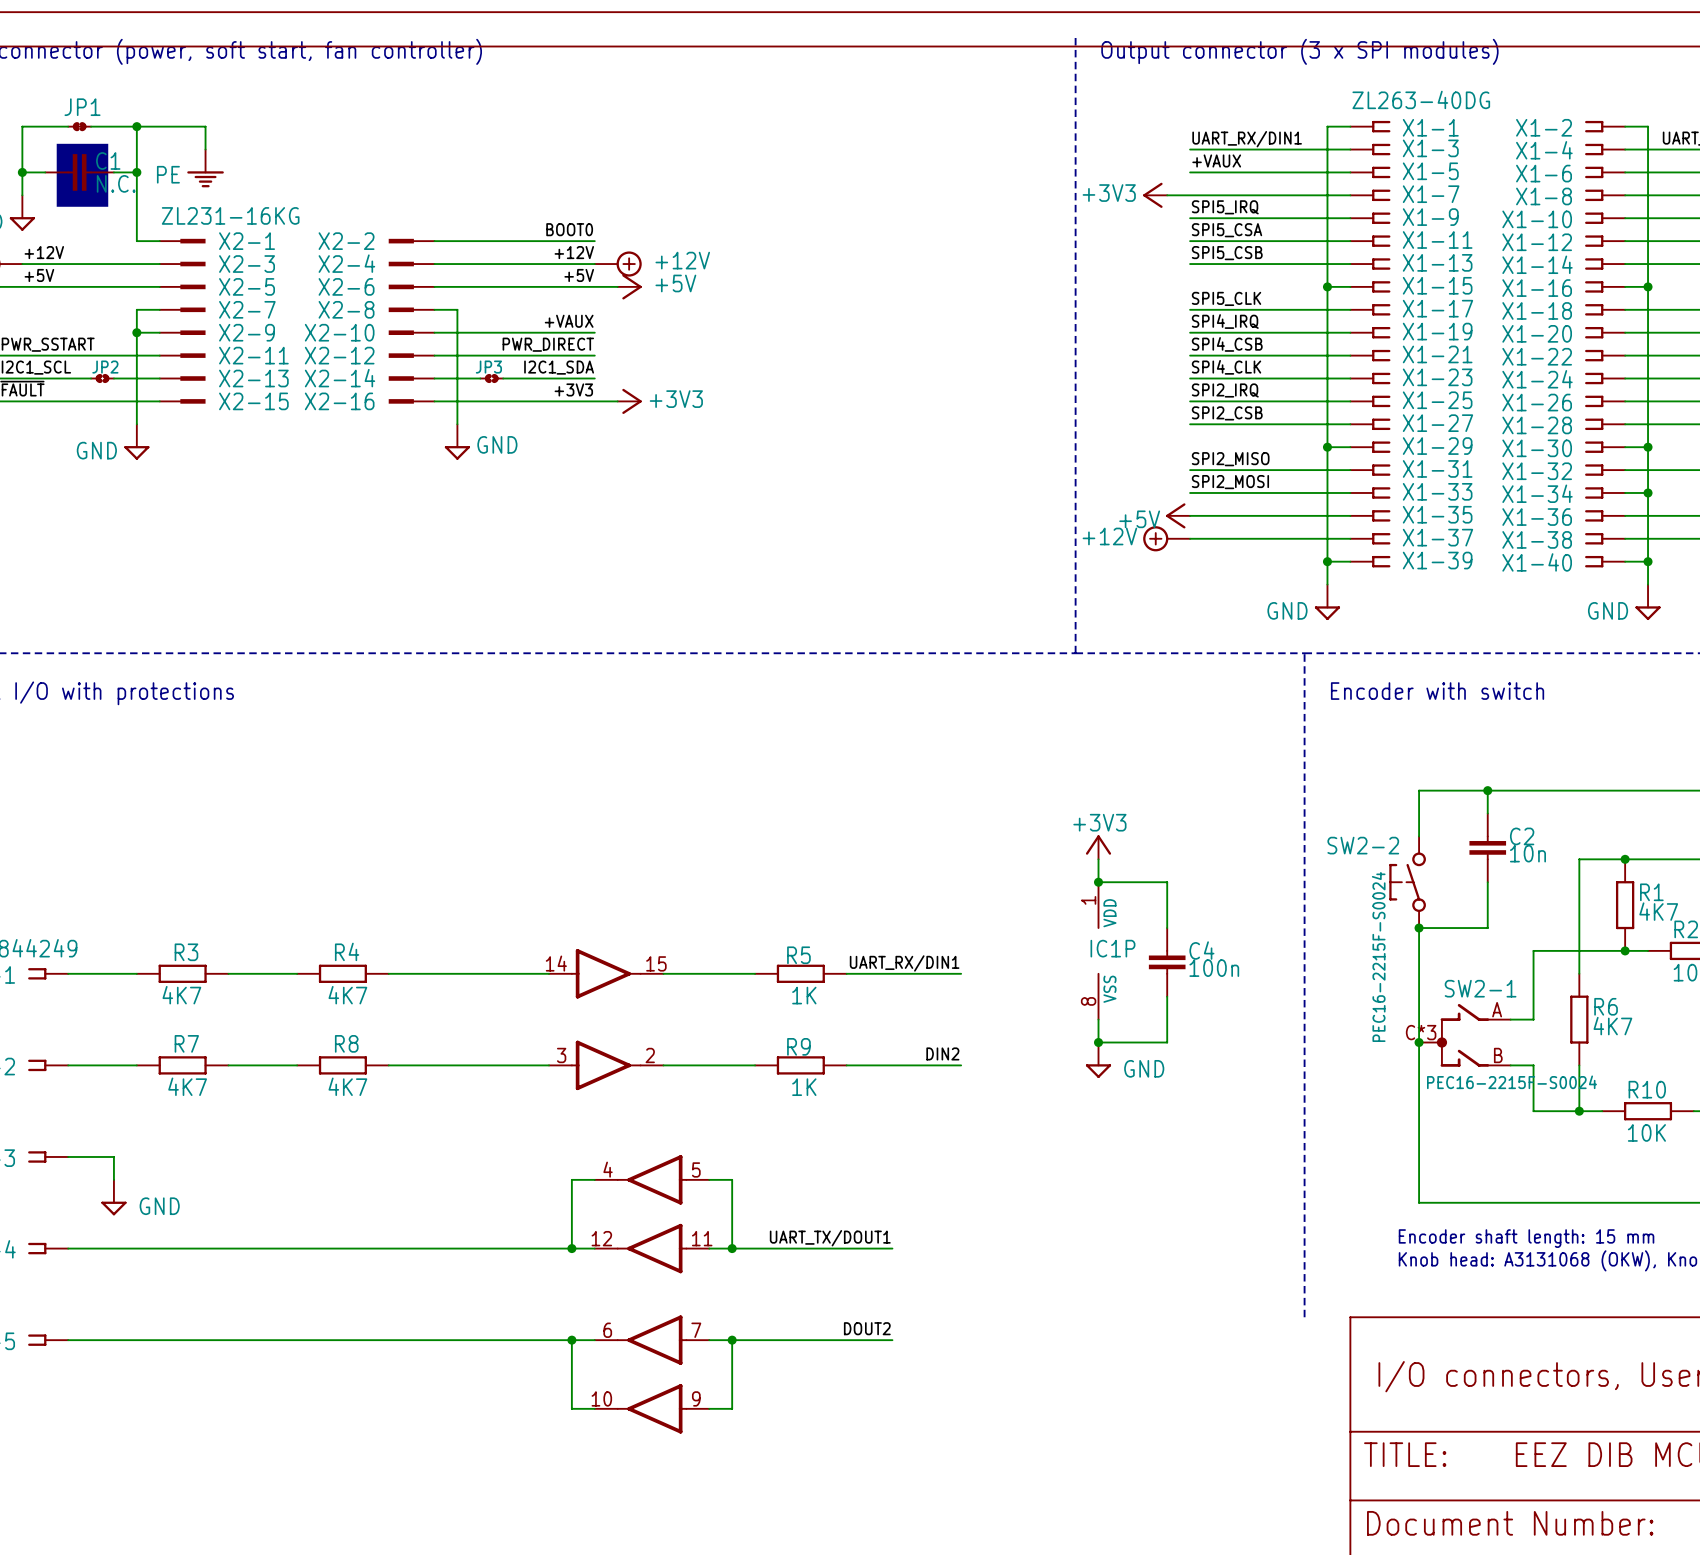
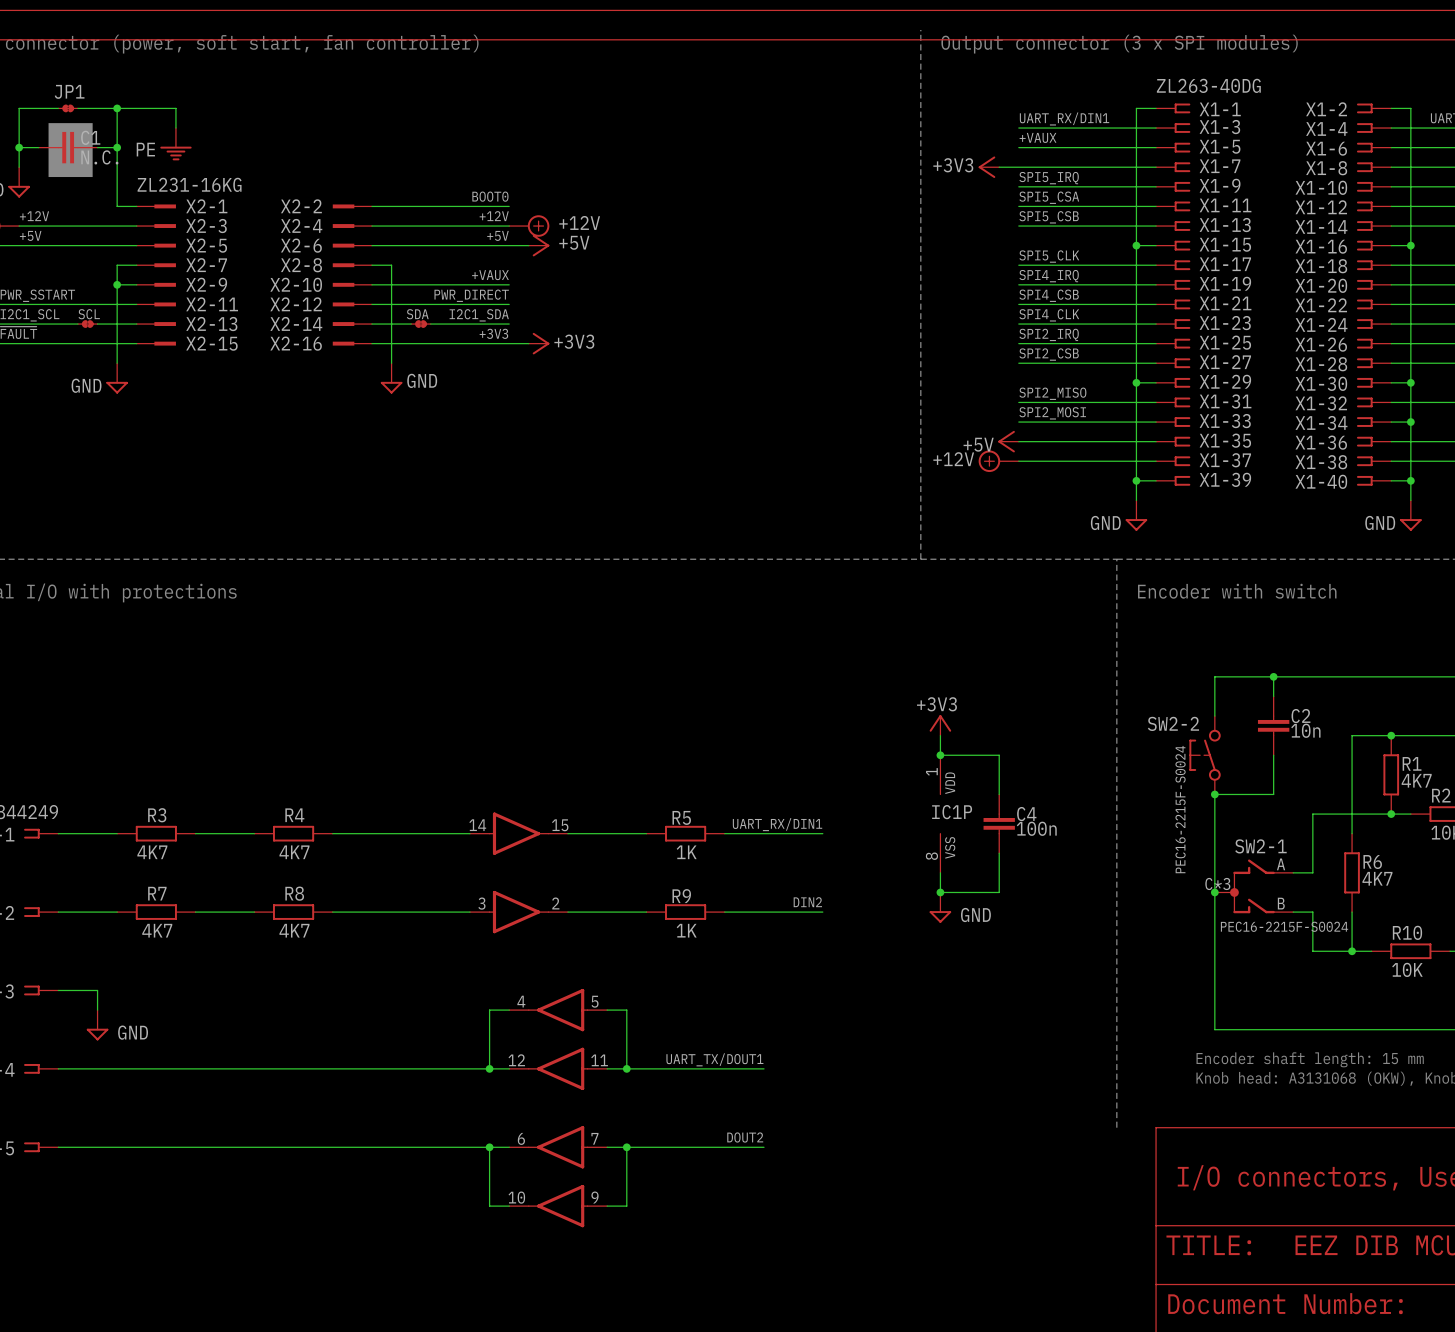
JP2: (102, 378) -> none
SCL: none -> (87, 324)
JP3: (491, 378) -> none
SDA: none -> (420, 324)

